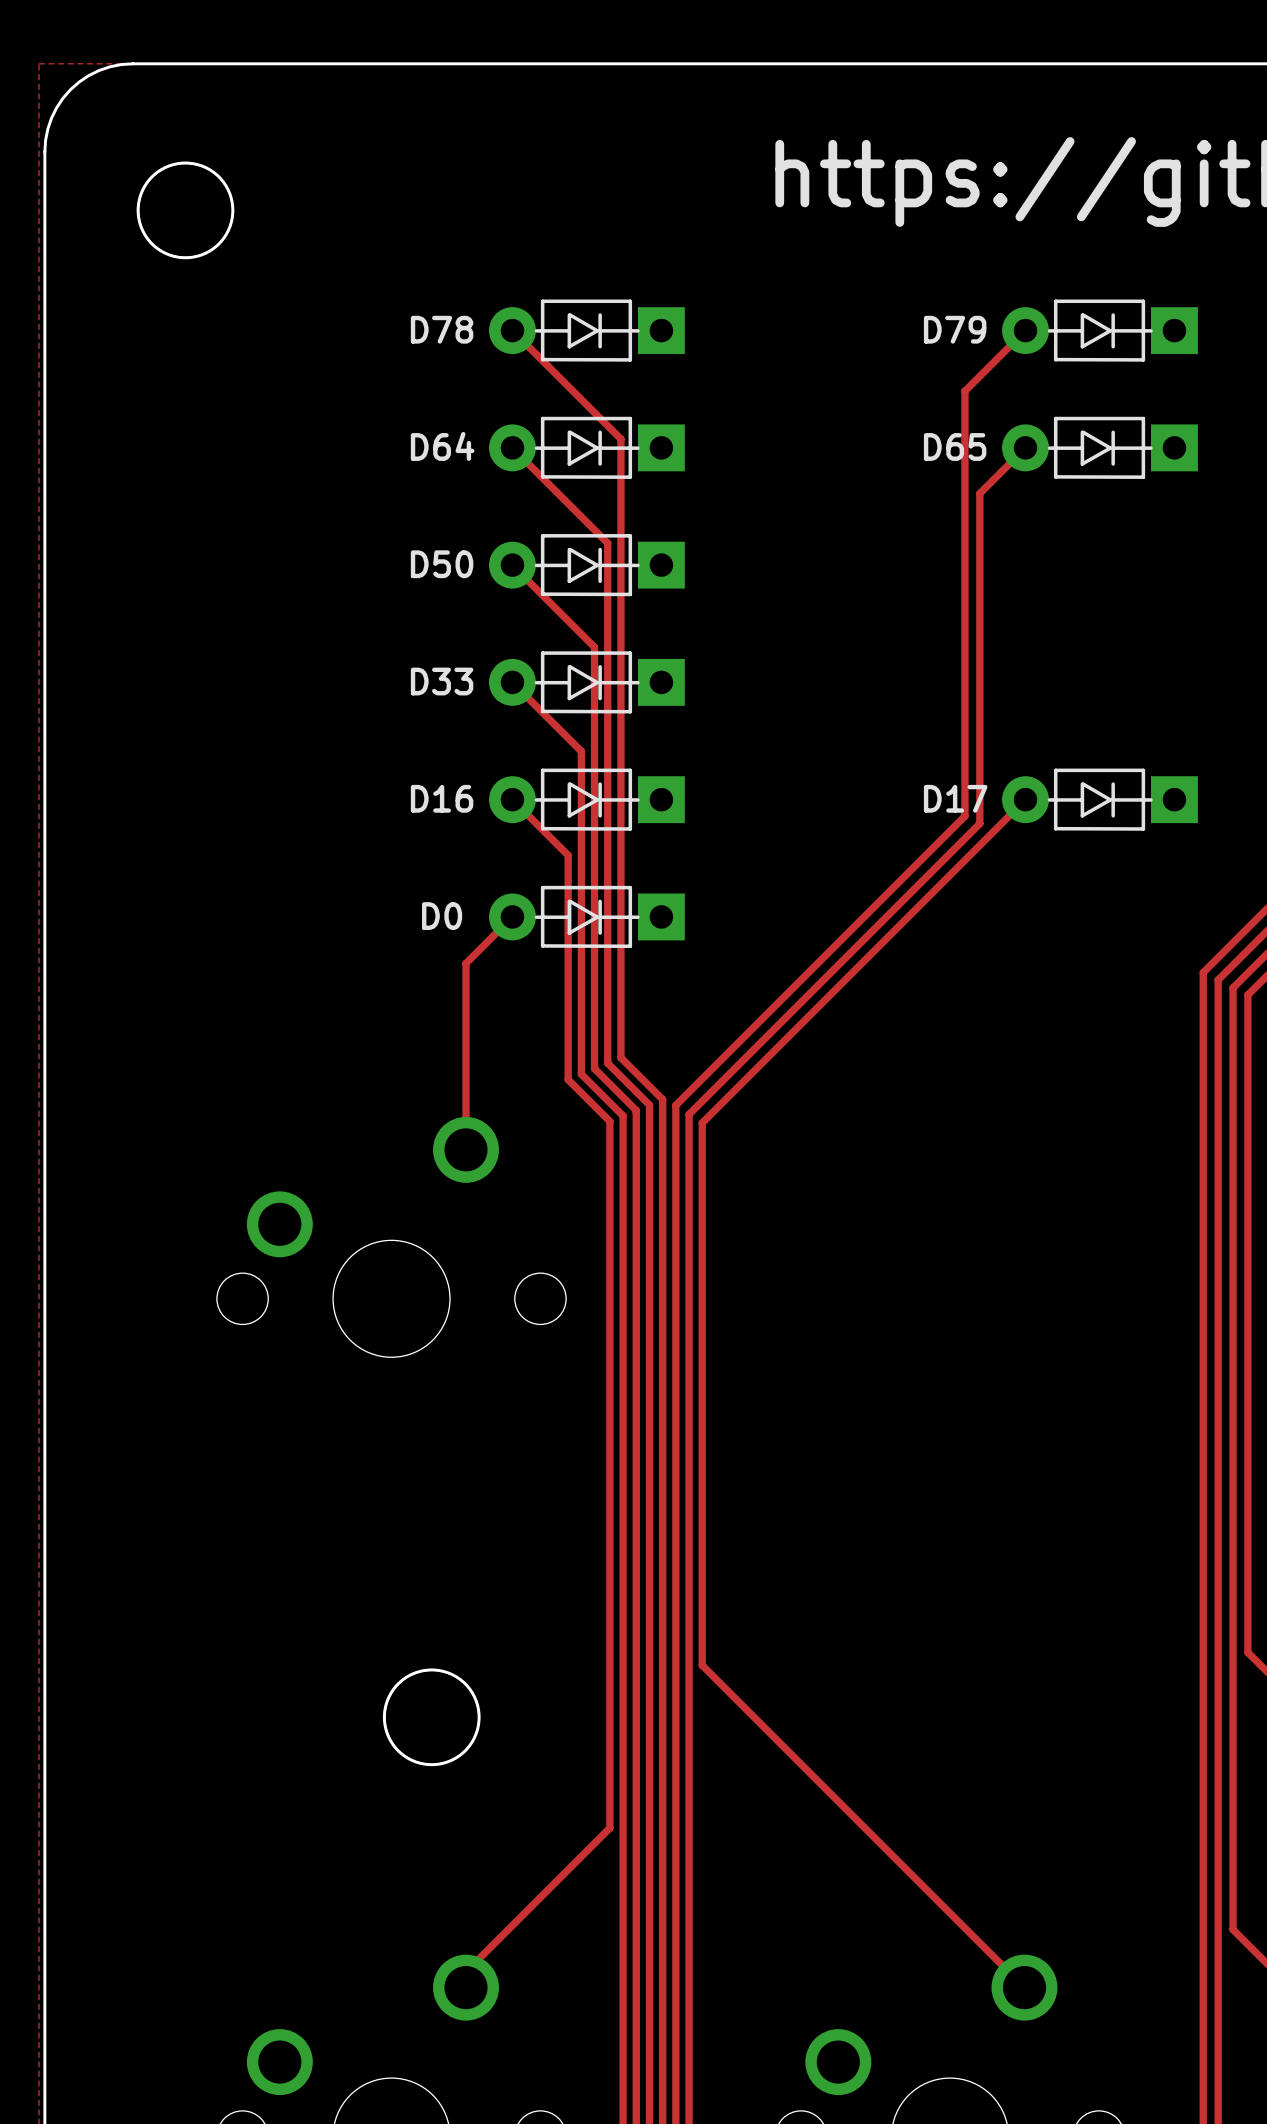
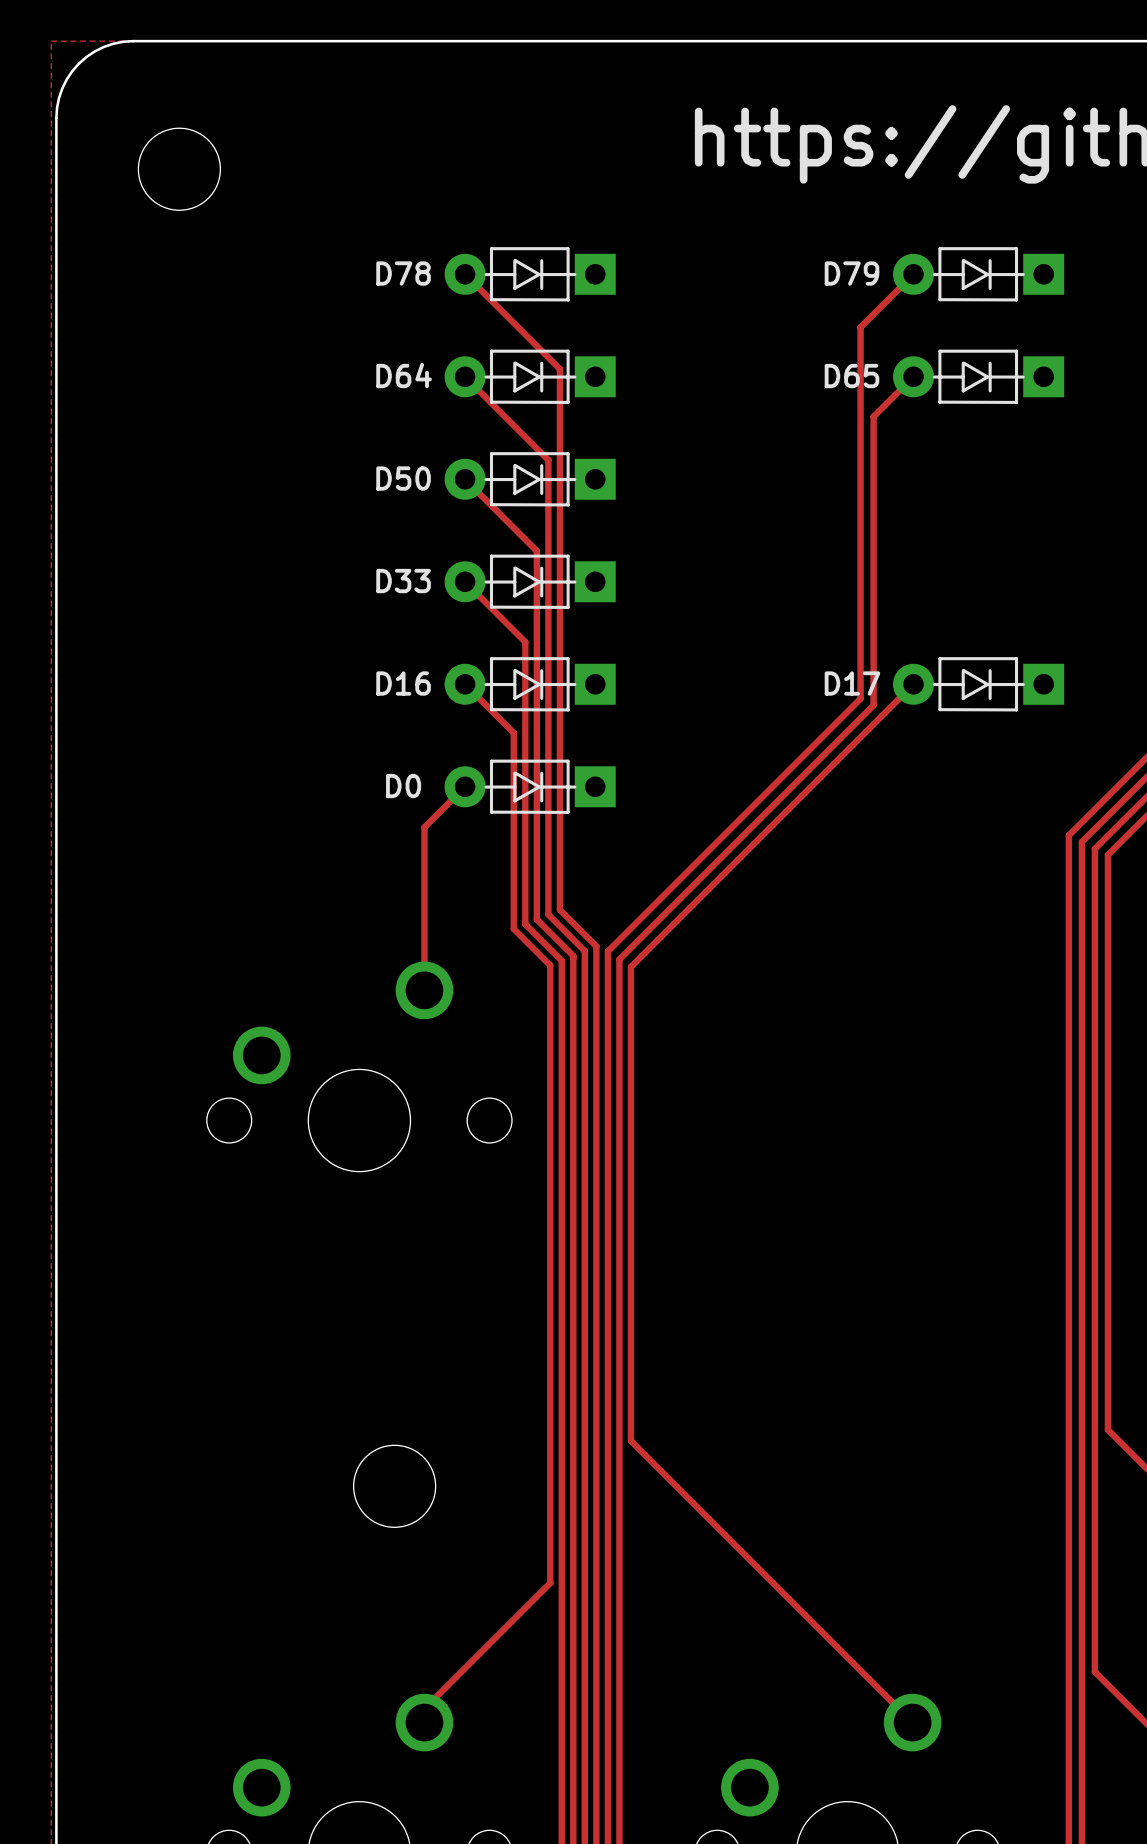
round board edge: [136, 161, 235, 260] -> none
round board edge: [382, 1668, 481, 1767] -> none

